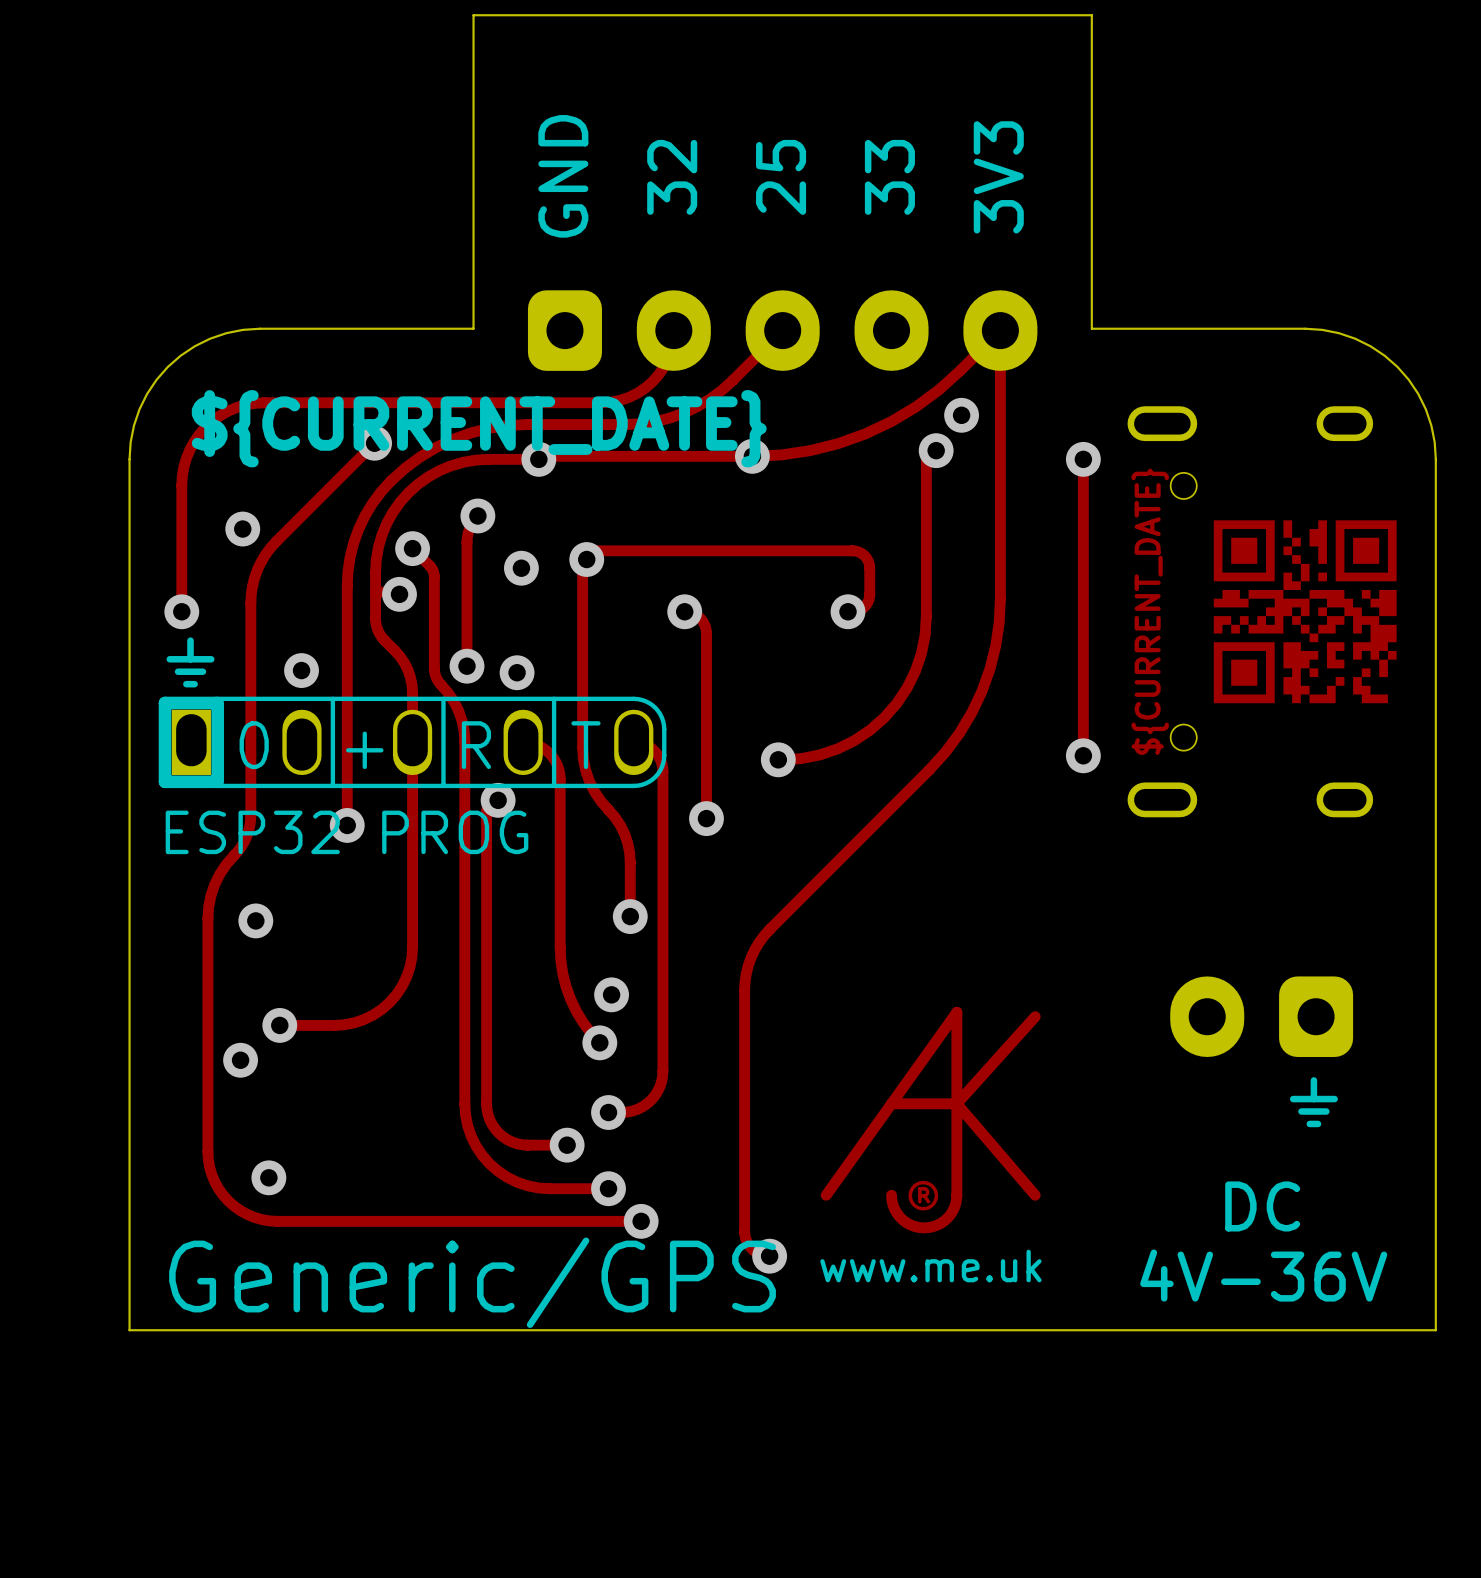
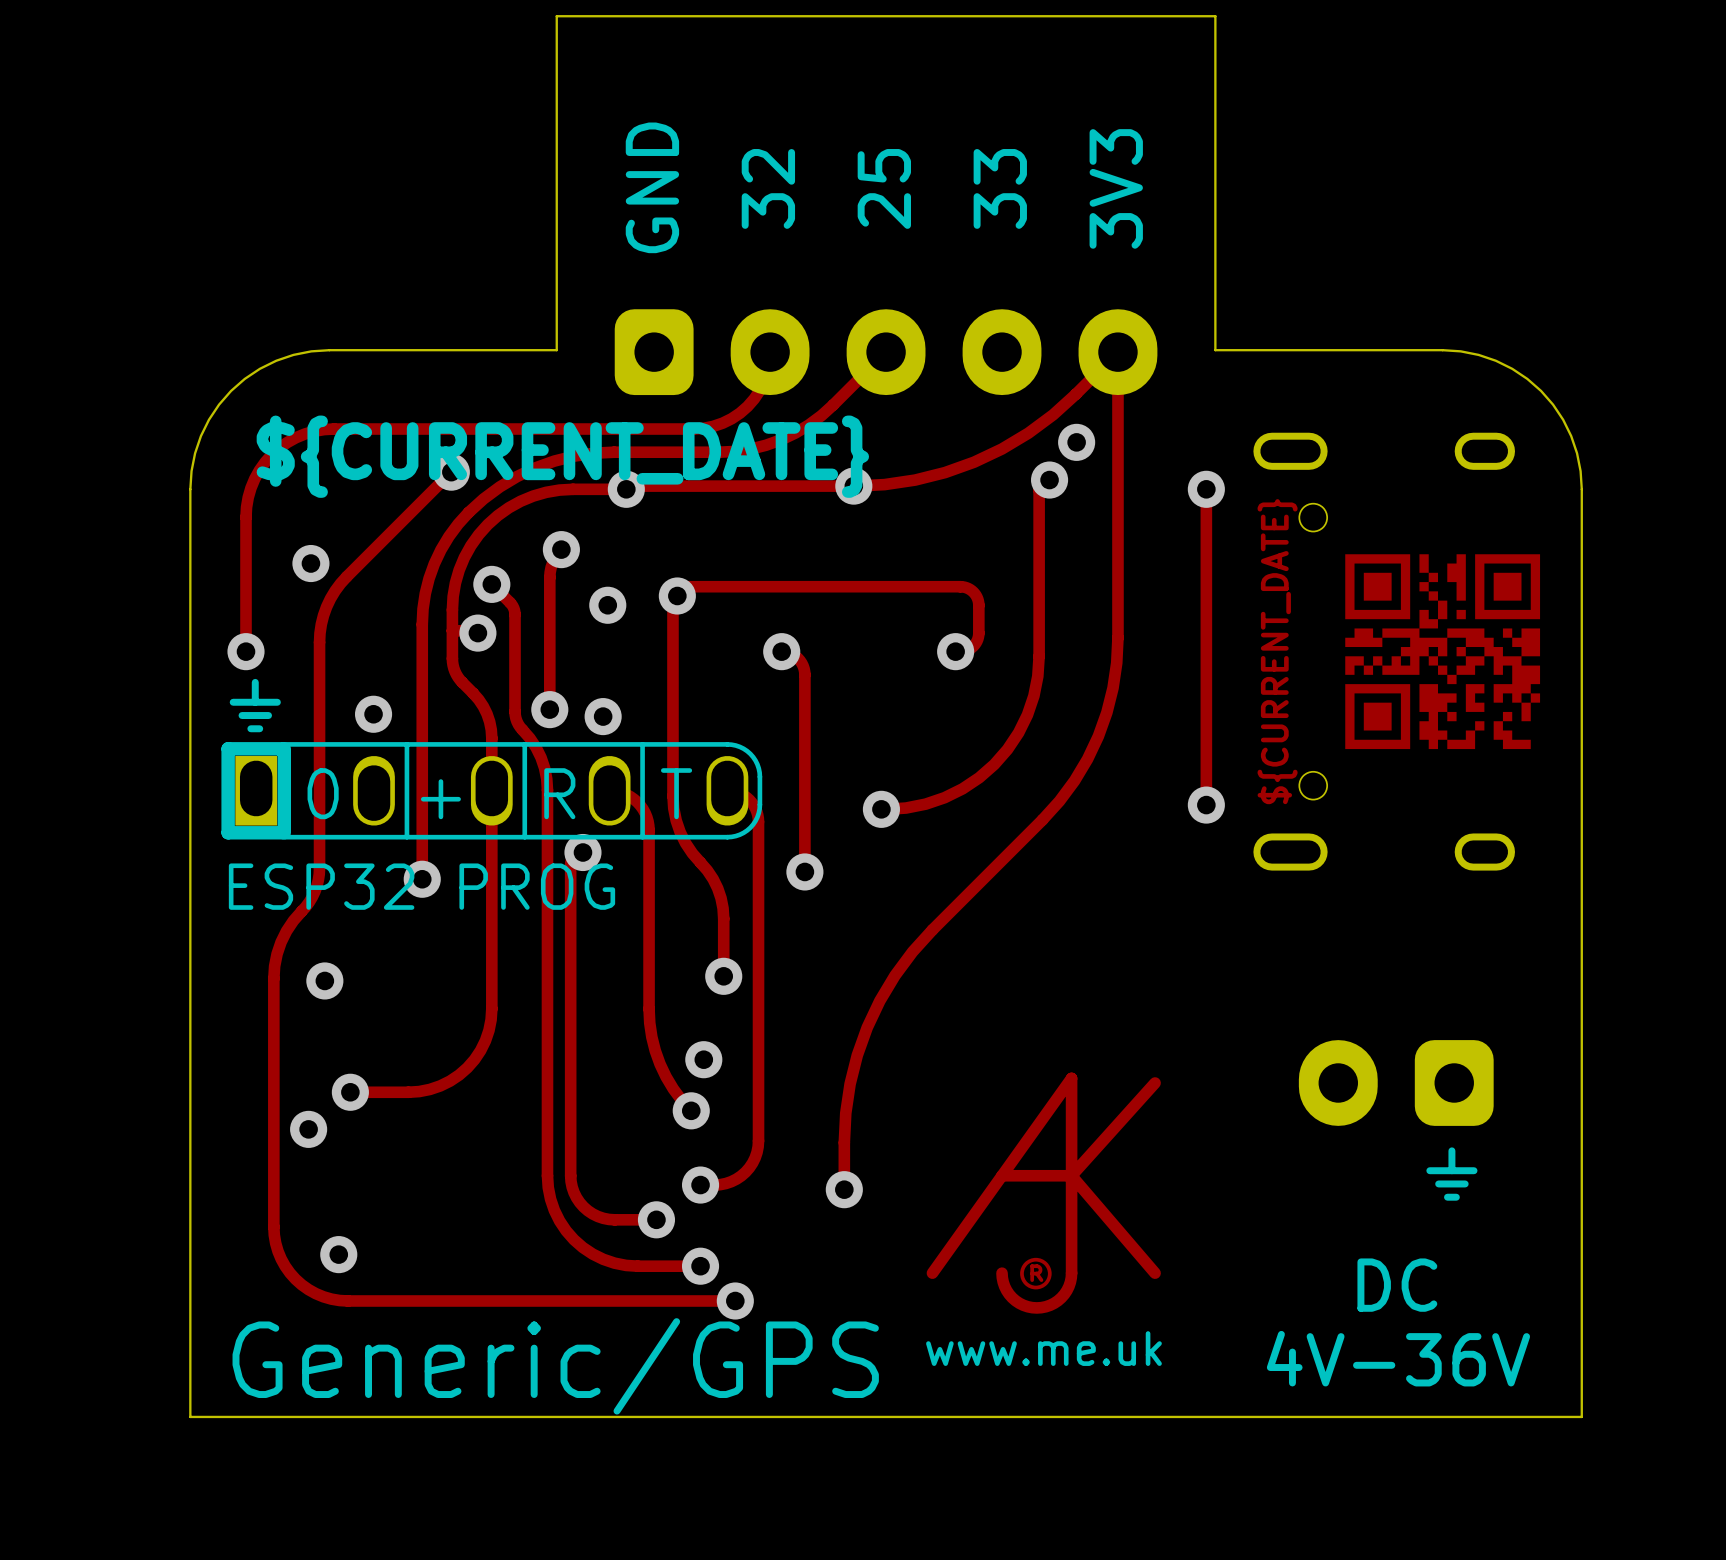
track: (826, 873) (764, 935) (751, 957) (745, 982) (744, 1233) (751, 1248) (758, 1253) (769, 1256) -> (932, 929) (912, 951) (879, 1000) (857, 1055) (845, 1113) (844, 1189)
via position: (769, 1256) -> (844, 1189)

